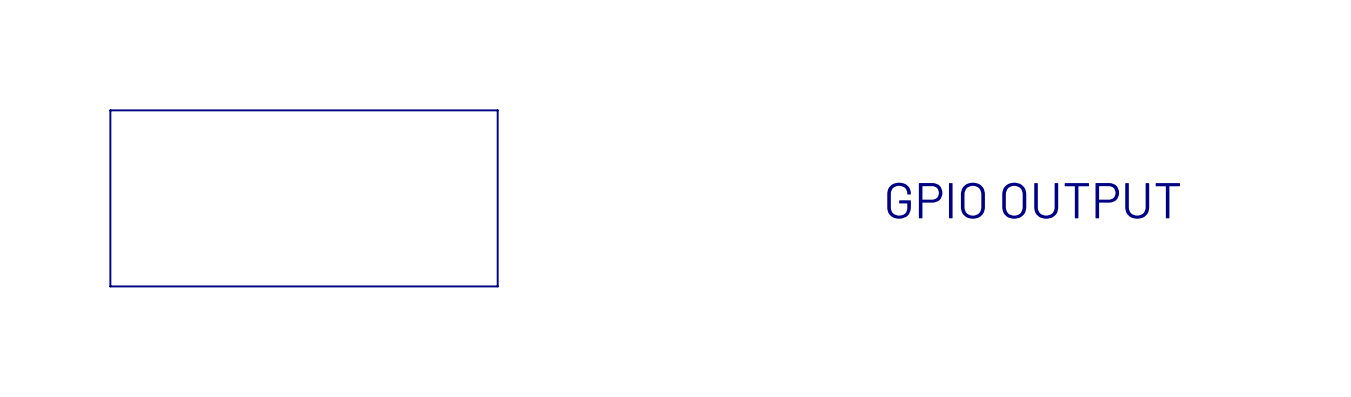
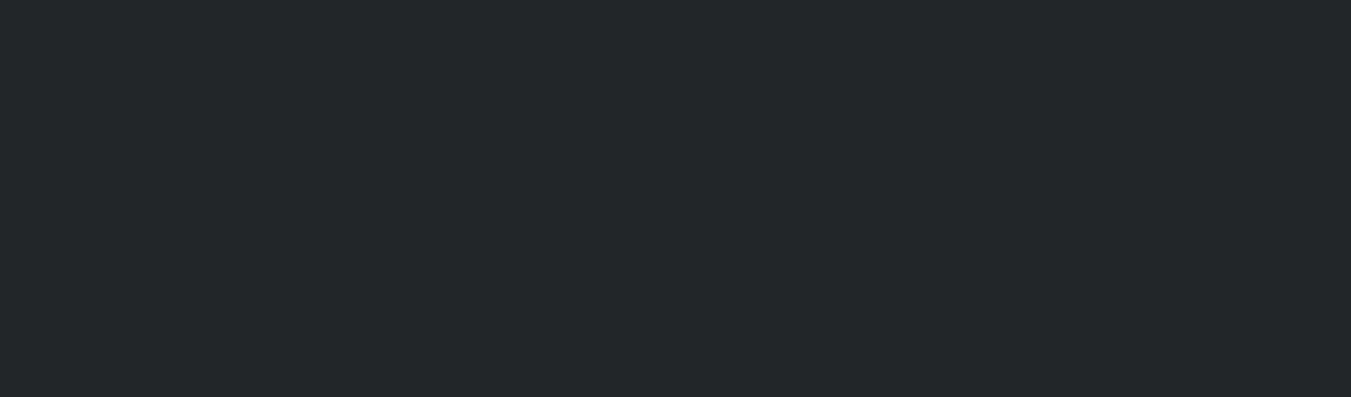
line: (110, 110) (497, 110) (497, 286) (110, 286) (110, 110) -> none
text: GPIO OUTPUT (1033, 200) -> none

